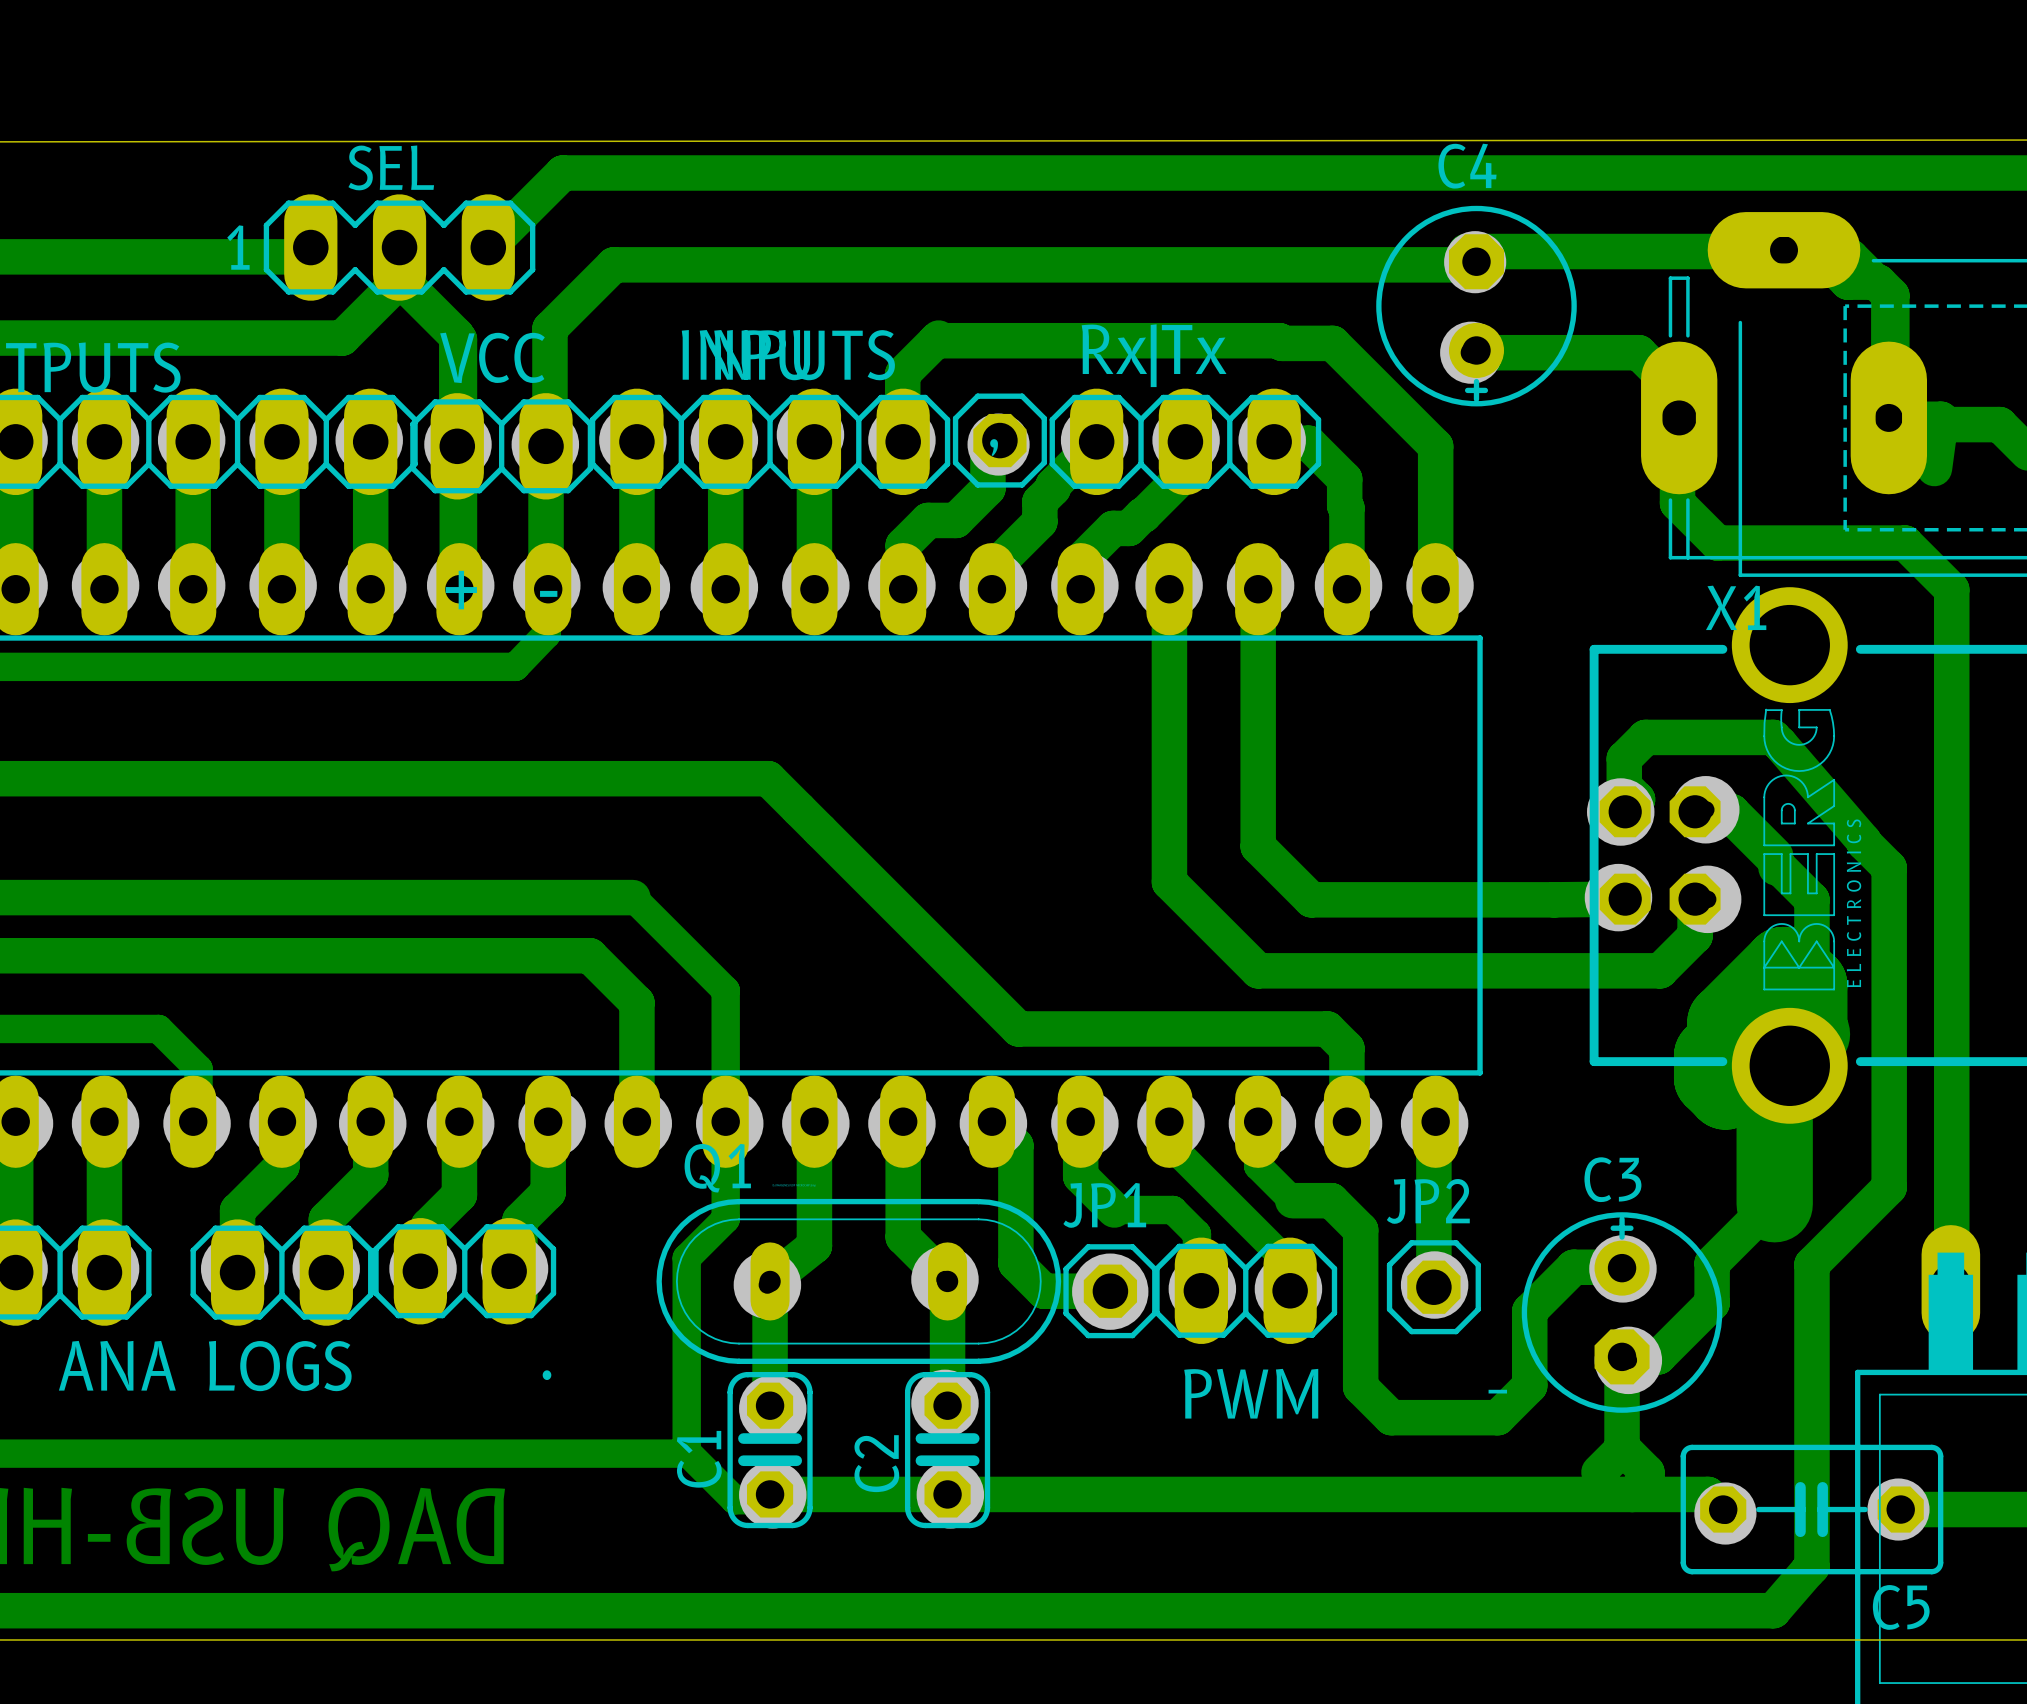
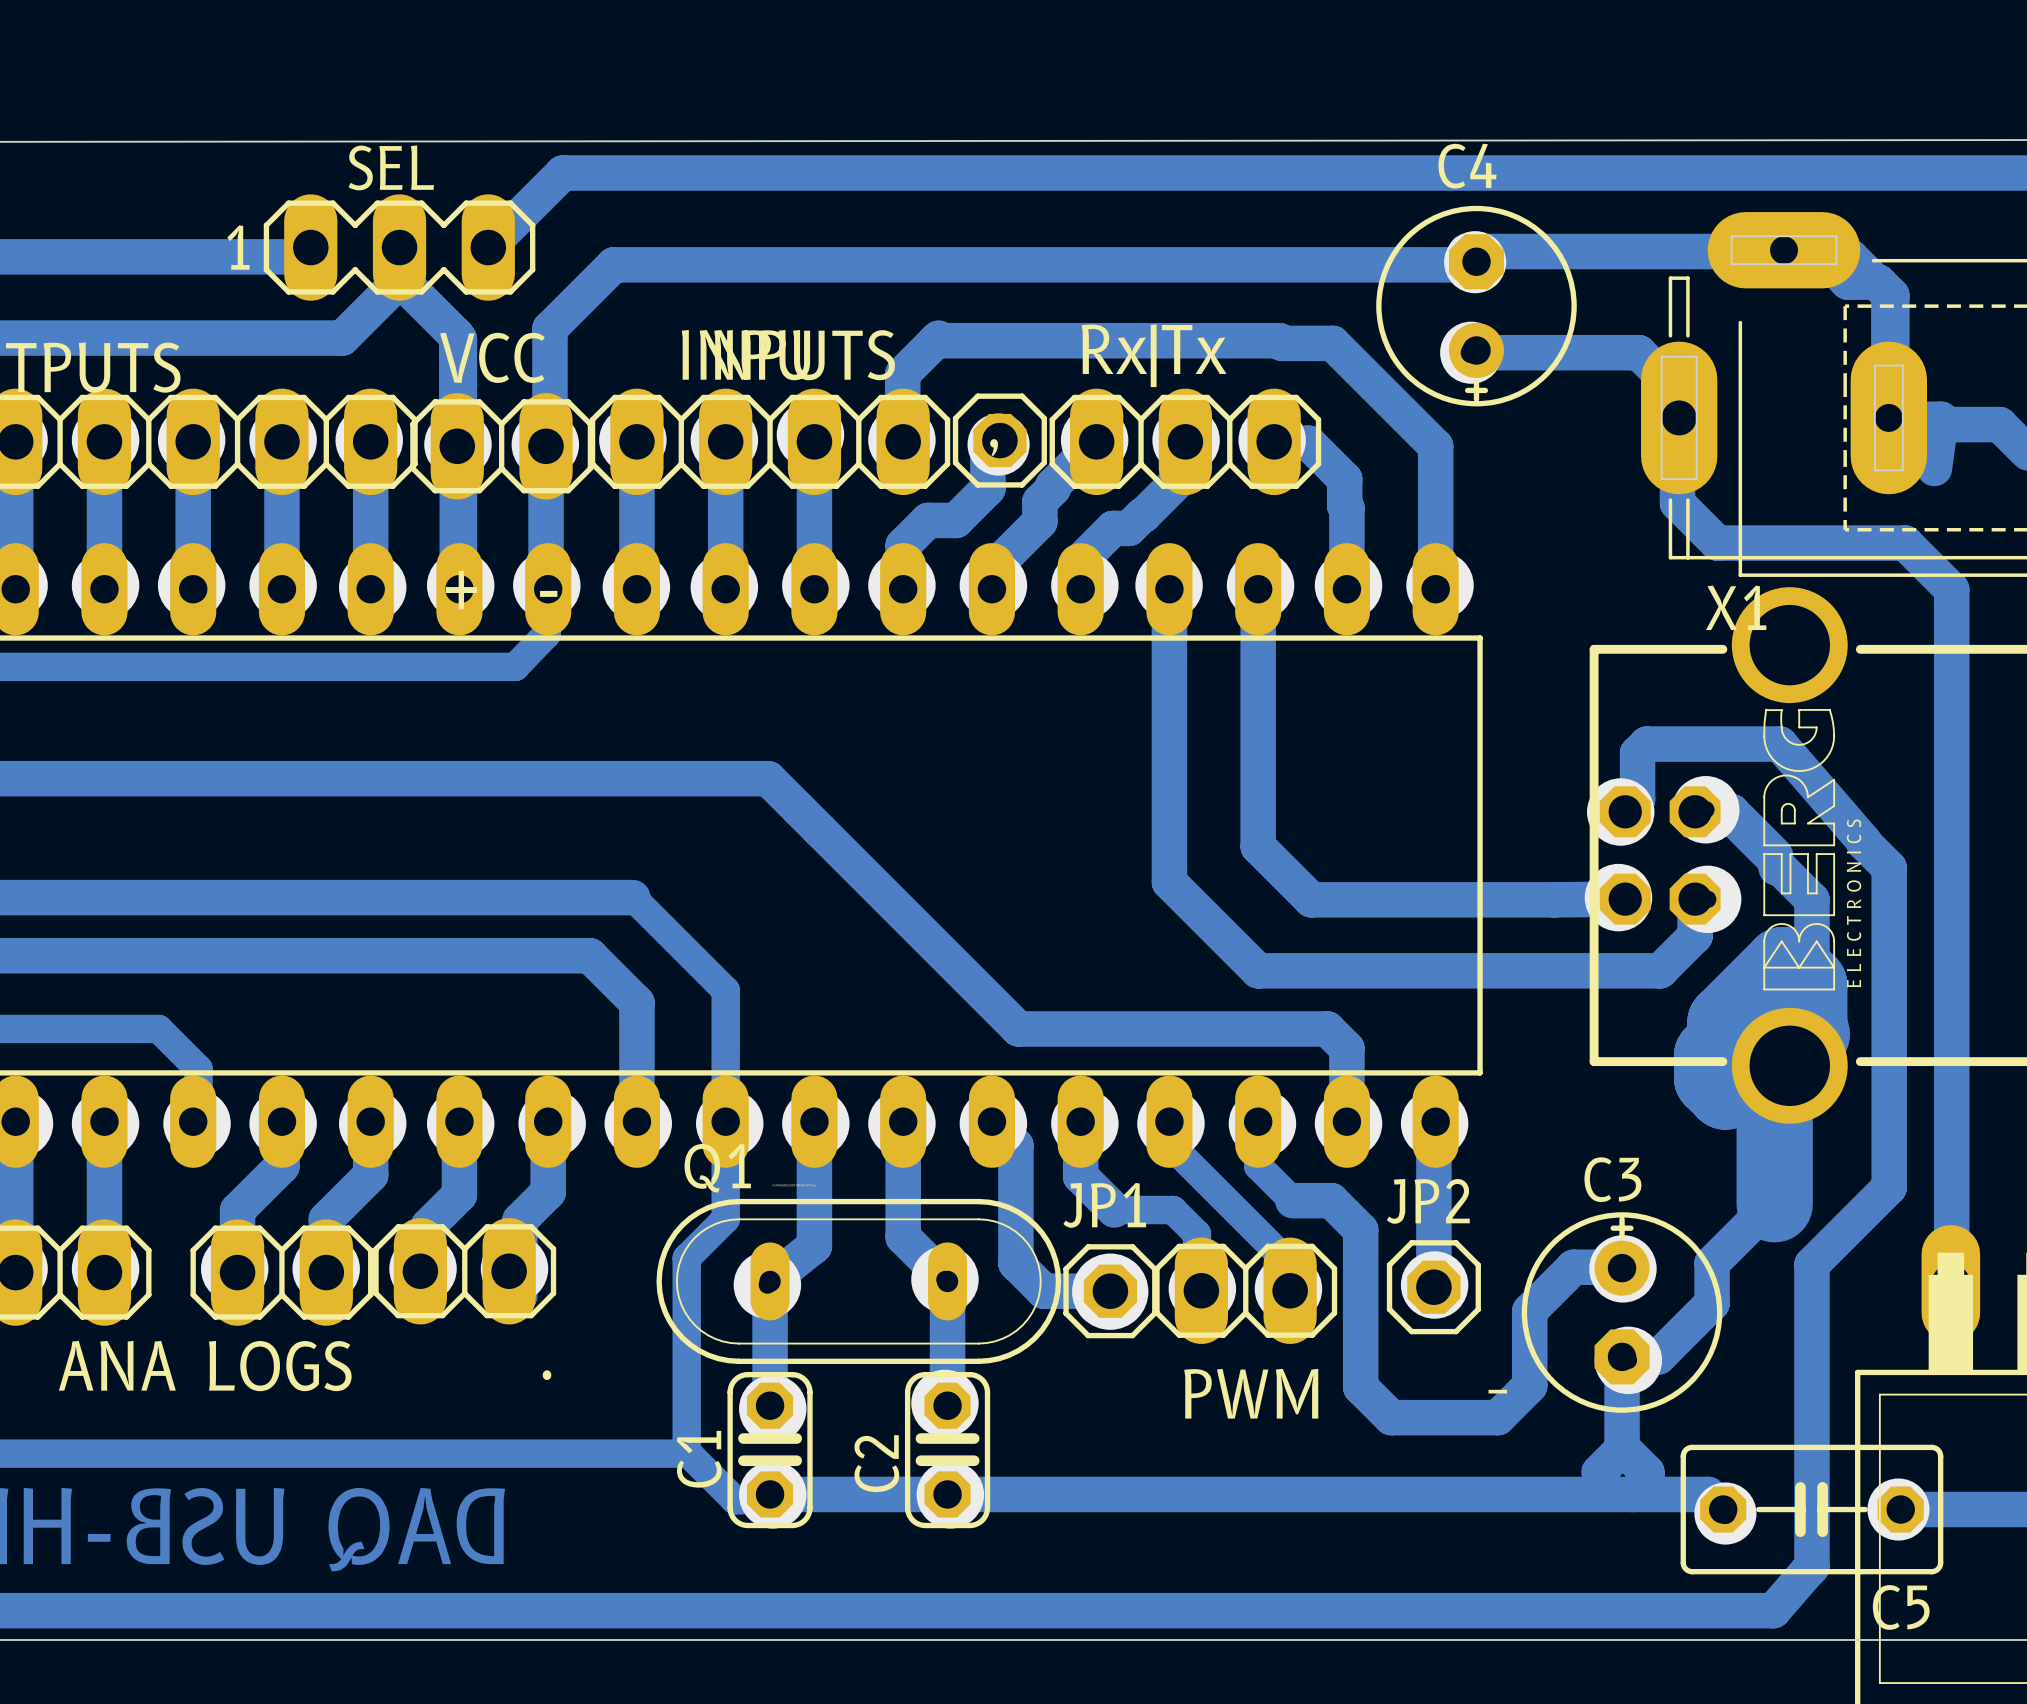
bottom track: (1780, 744) (1773, 737) (1645, 737) (1624, 758) (1624, 786) (1637, 799) -> (1780, 744) (1646, 744) (1637, 753) (1637, 799)

